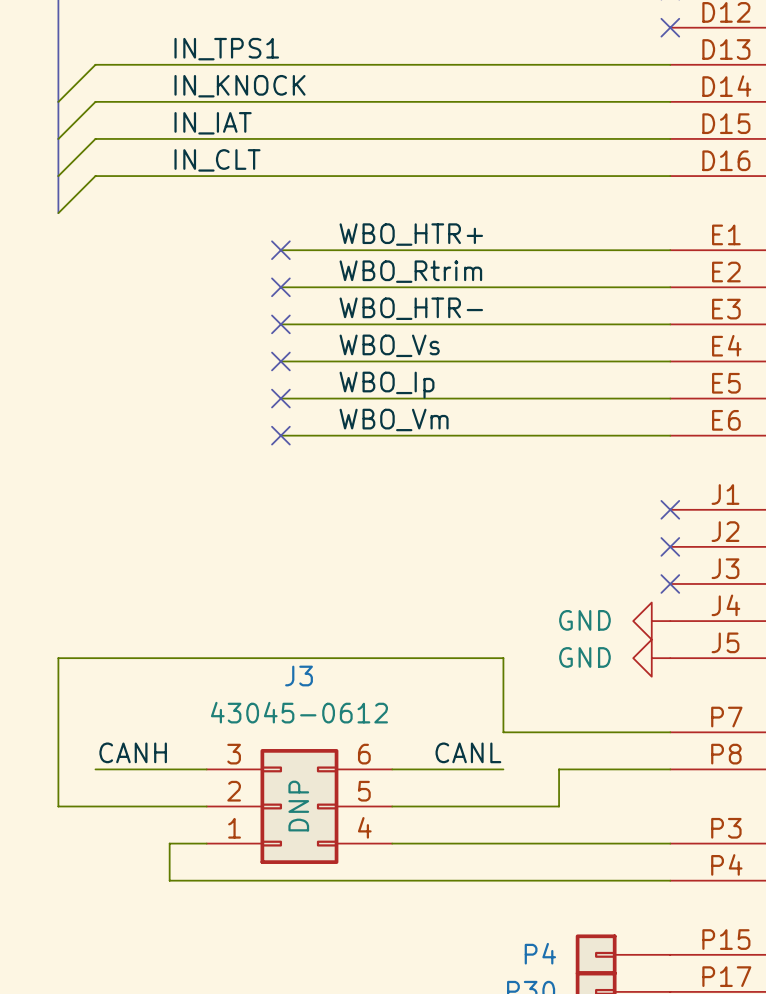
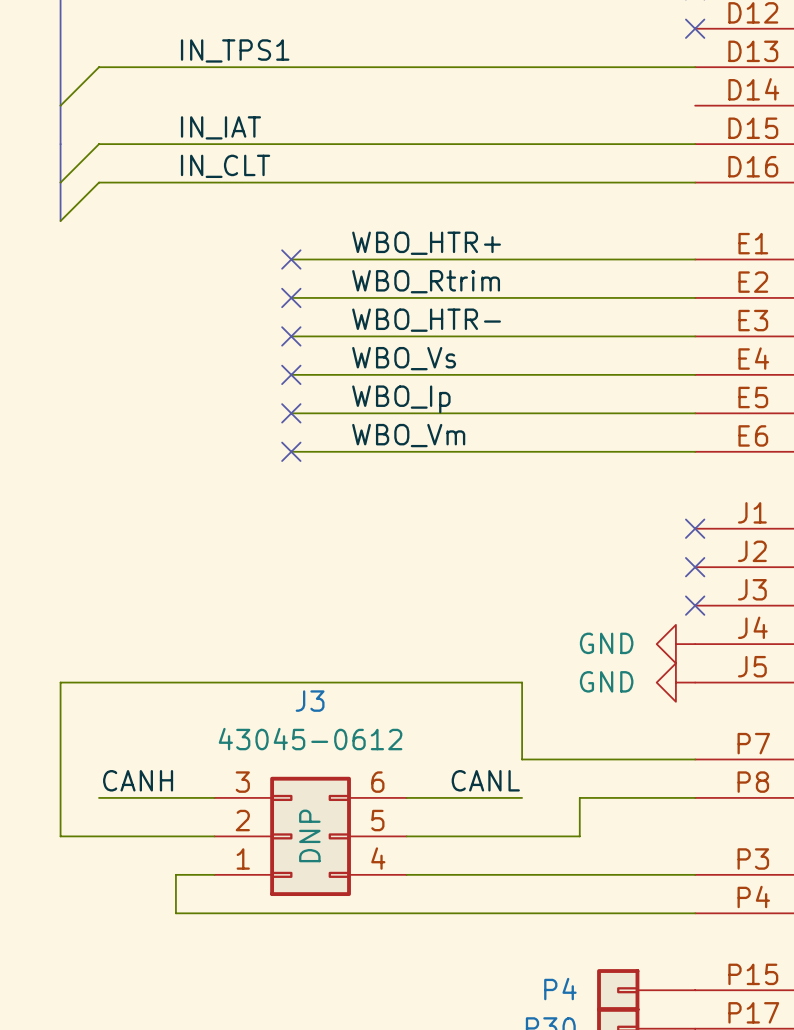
label: IN_KNOCK (239, 86) -> none
wire: (670, 101) (95, 101) (58, 138) -> none

